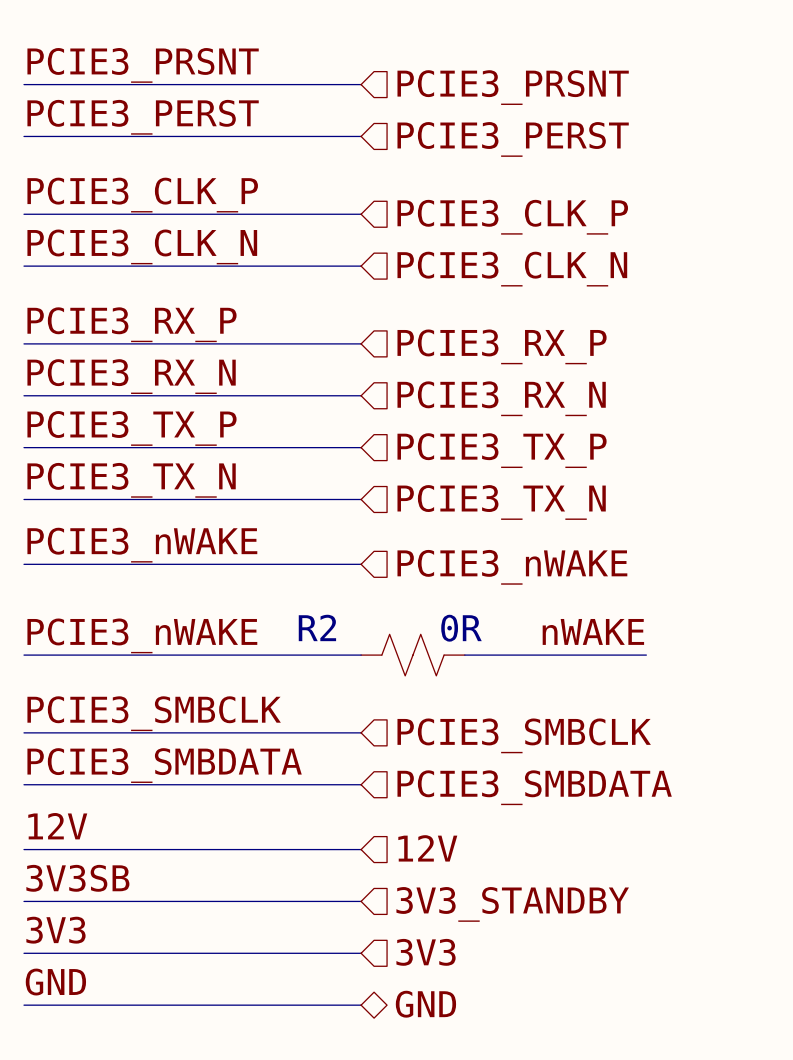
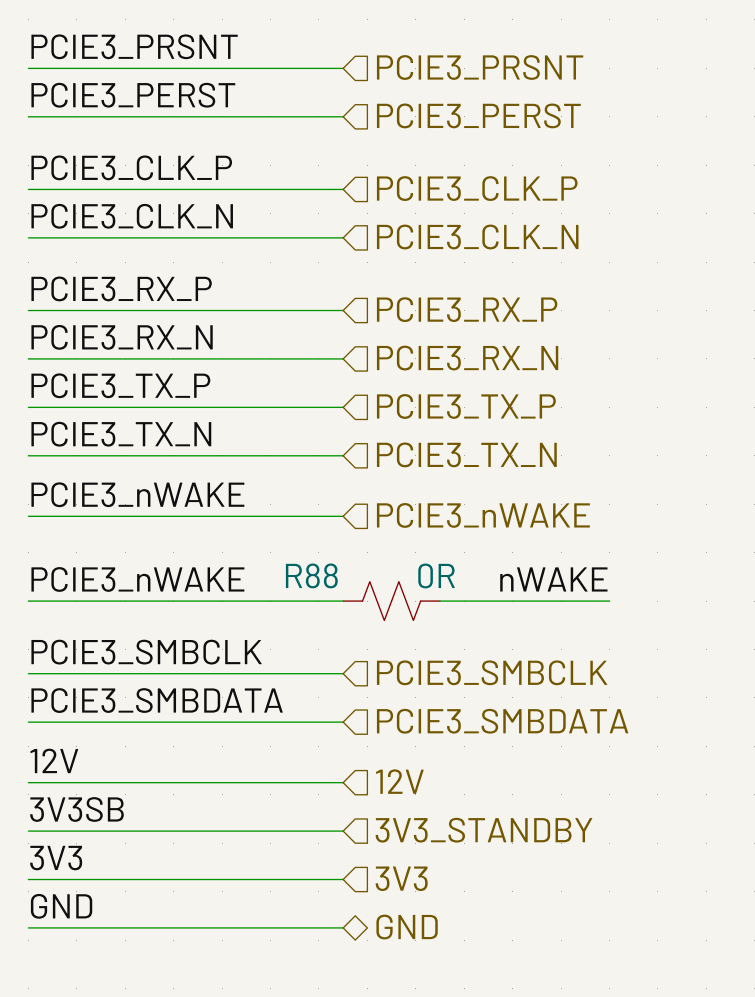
R2 name: R2 (317, 627) -> R88 (311, 575)

